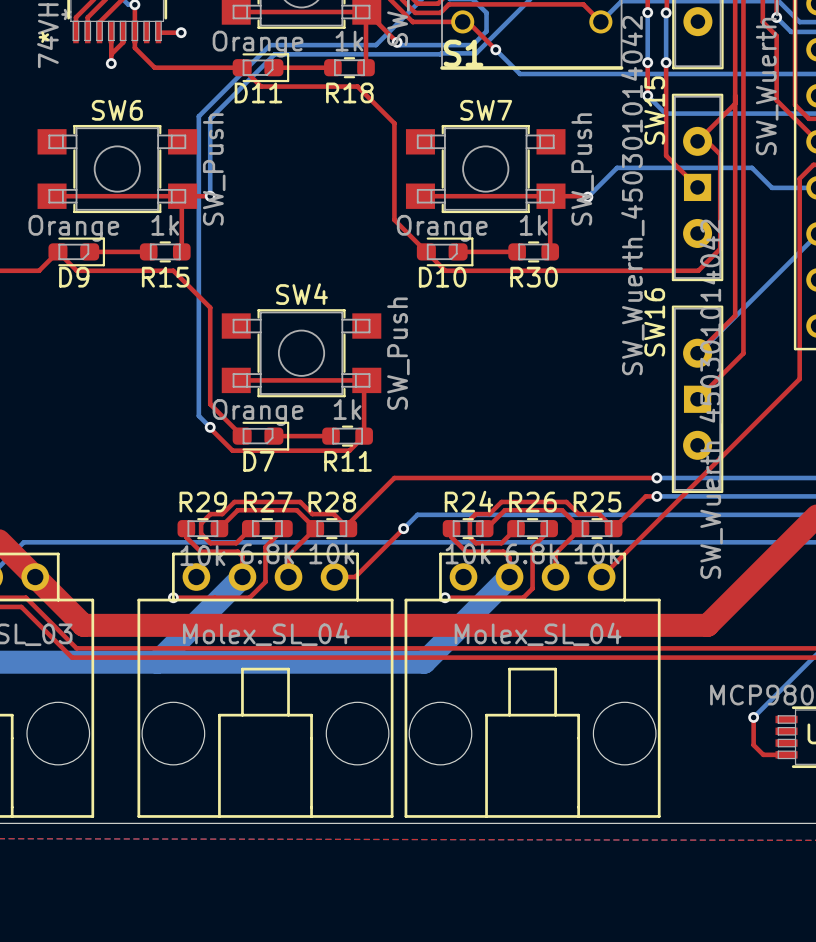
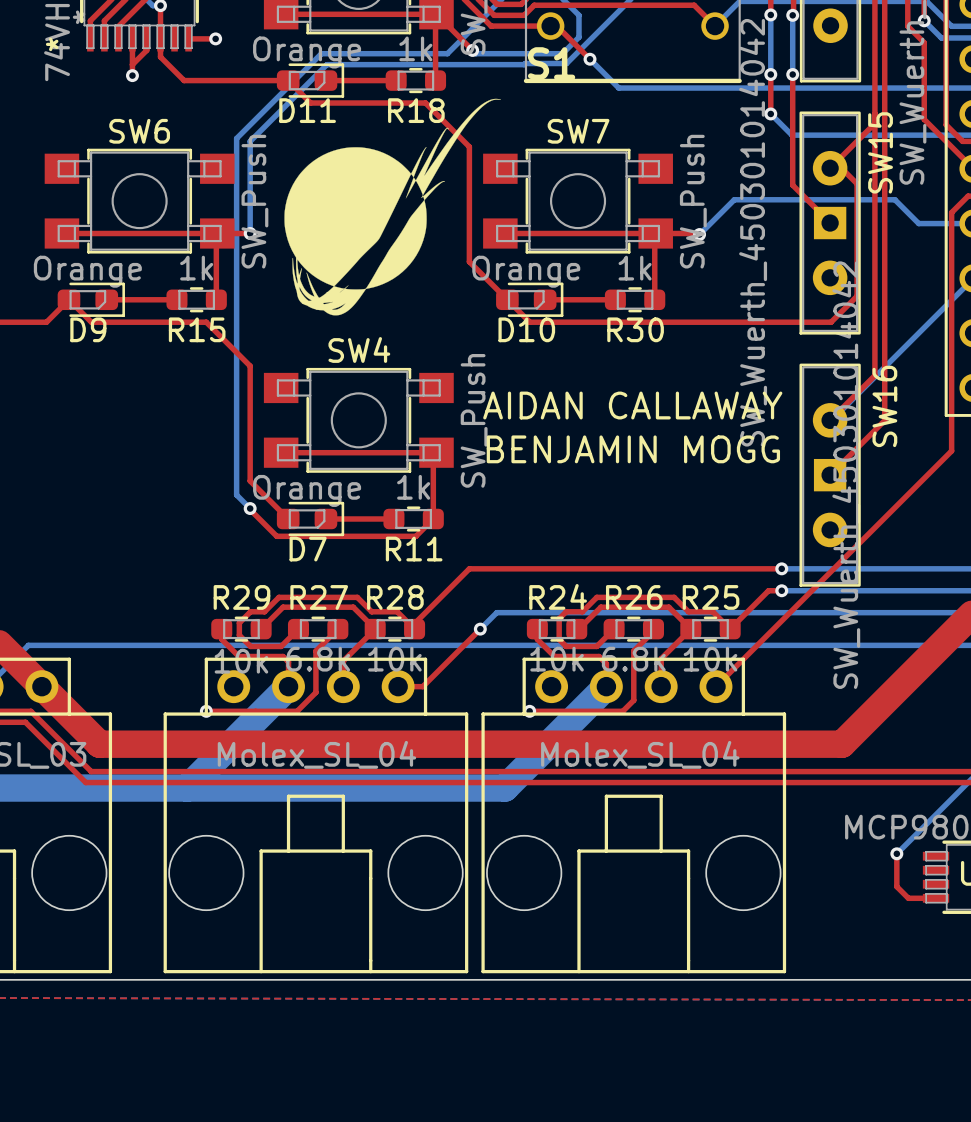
drawing: none -> [284, 98, 501, 316]
SW15 name position: SW15 (654, 110) -> SW15 (880, 152)
SW16 name position: SW16 (654, 322) -> SW16 (884, 406)
text: none -> AIDAN CALLAWAY (632, 405)
text: none -> BENJAMIN MOGG (633, 449)

